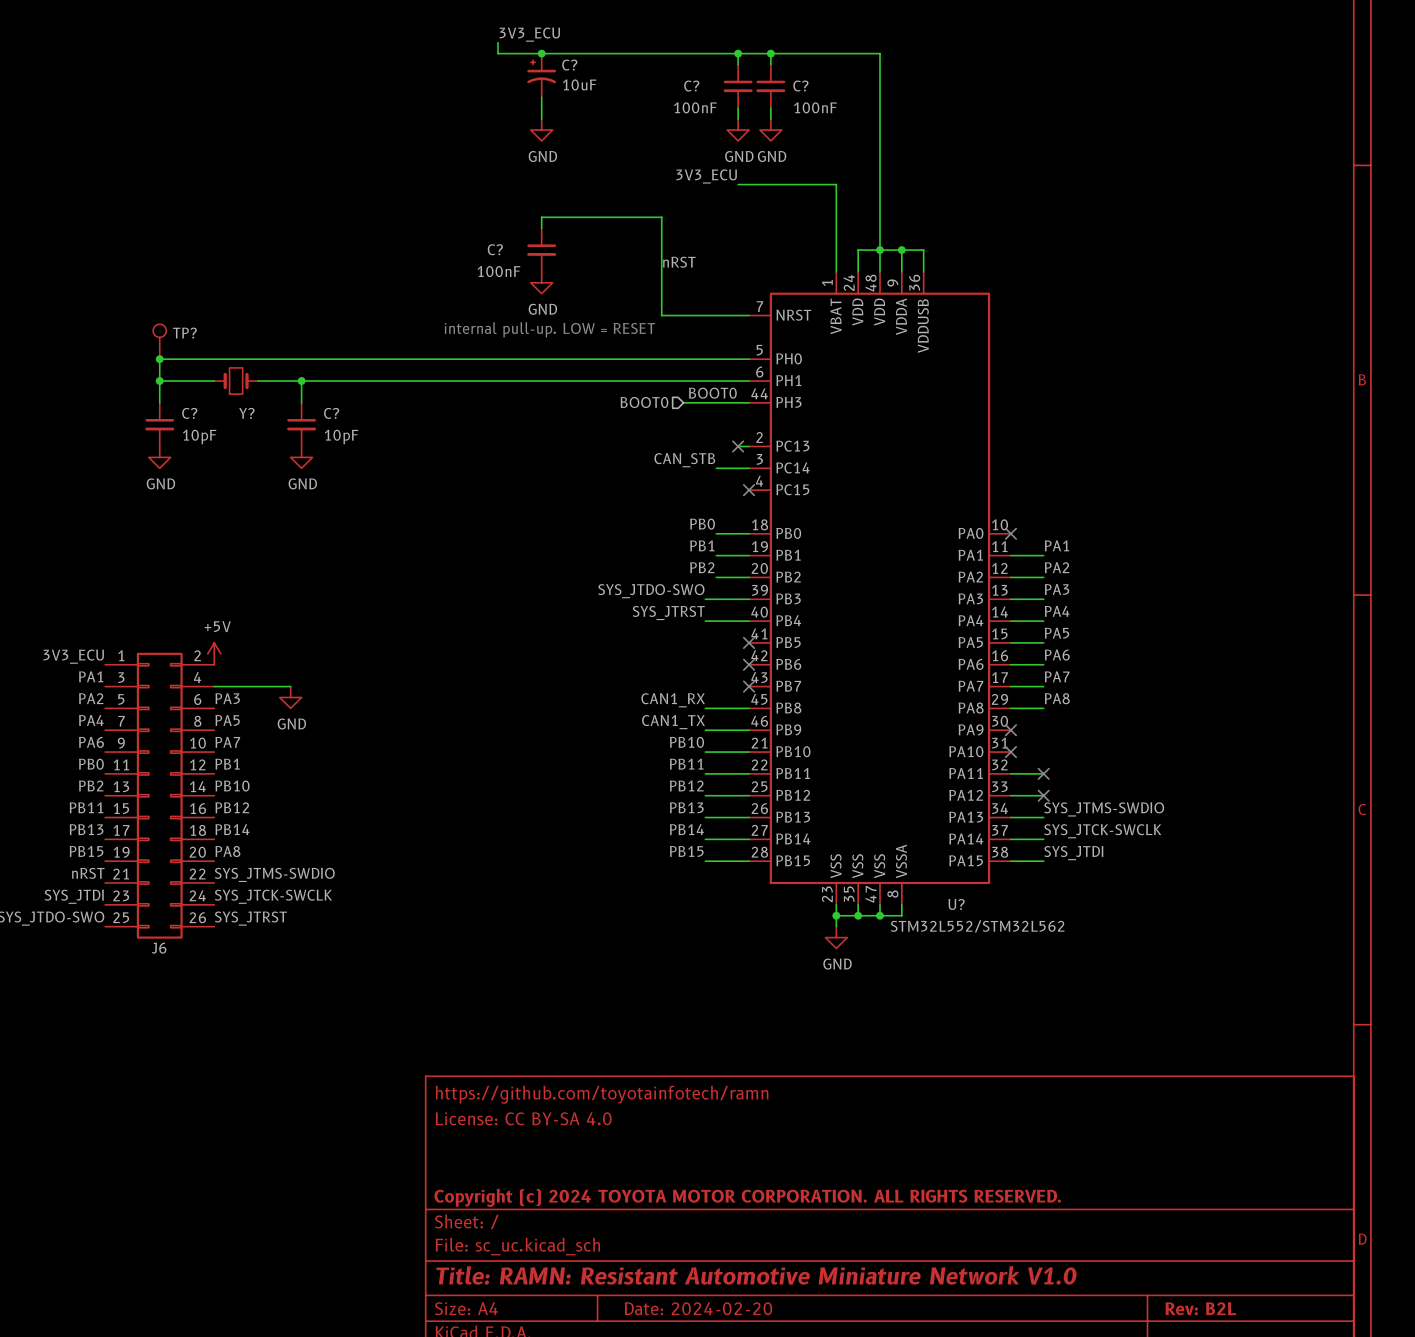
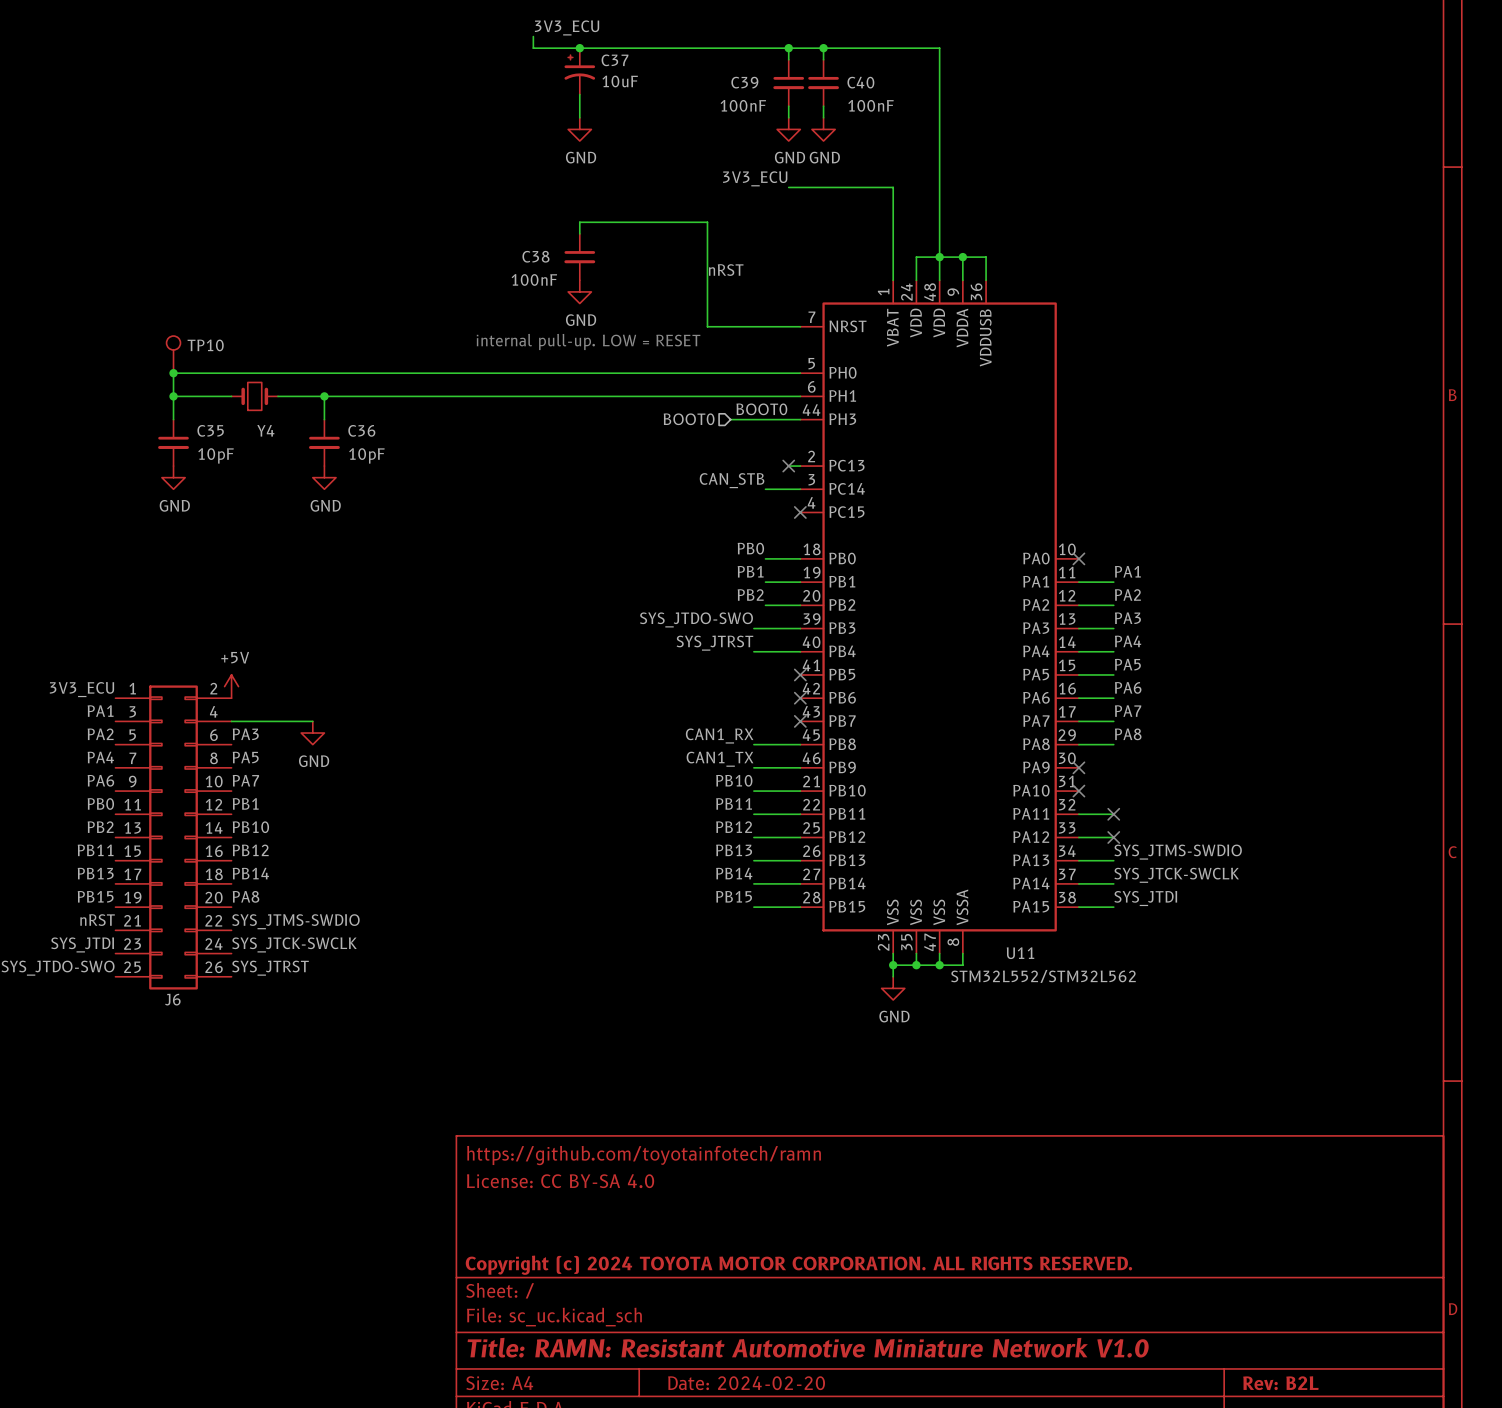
C? name: C? (569, 65) -> C37 (615, 60)
C? name: C? (691, 86) -> C39 (744, 82)
C? name: C? (800, 86) -> C40 (860, 82)
C? name: C? (495, 249) -> C38 (535, 256)
TP? name: TP? (184, 333) -> TP10 (205, 345)
C? name: C? (189, 413) -> C35 (210, 430)
Y? name: Y? (246, 413) -> Y4 (265, 430)
C? name: C? (331, 413) -> C36 (361, 430)
U? name: U? (956, 904) -> U11 (1020, 953)

